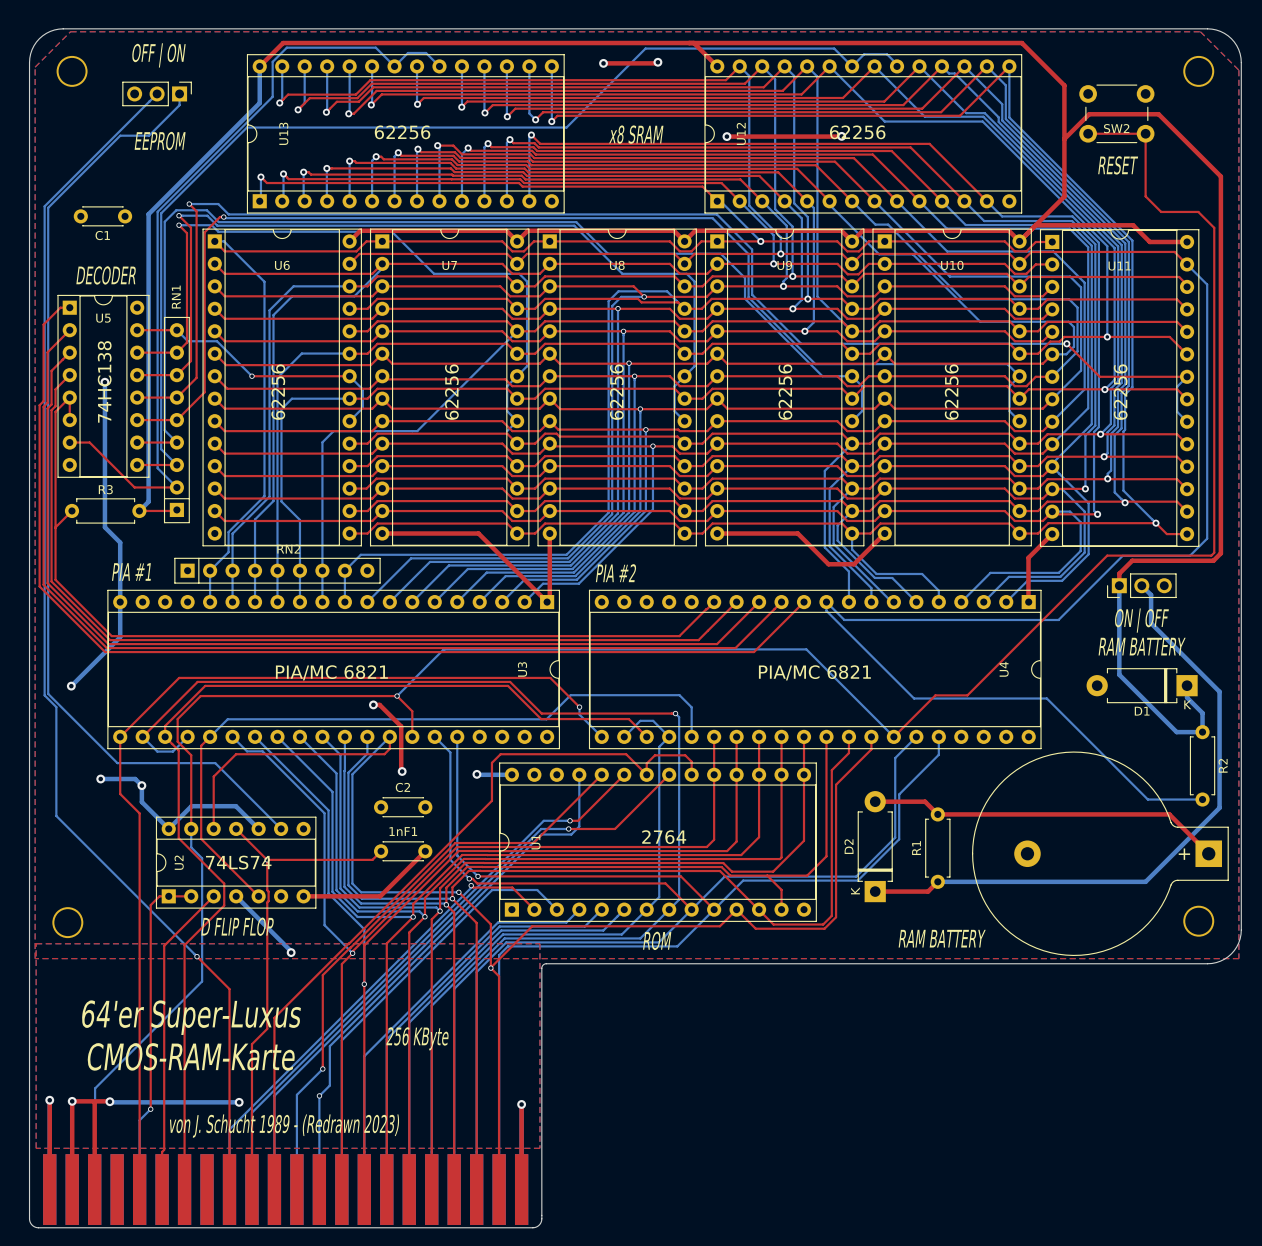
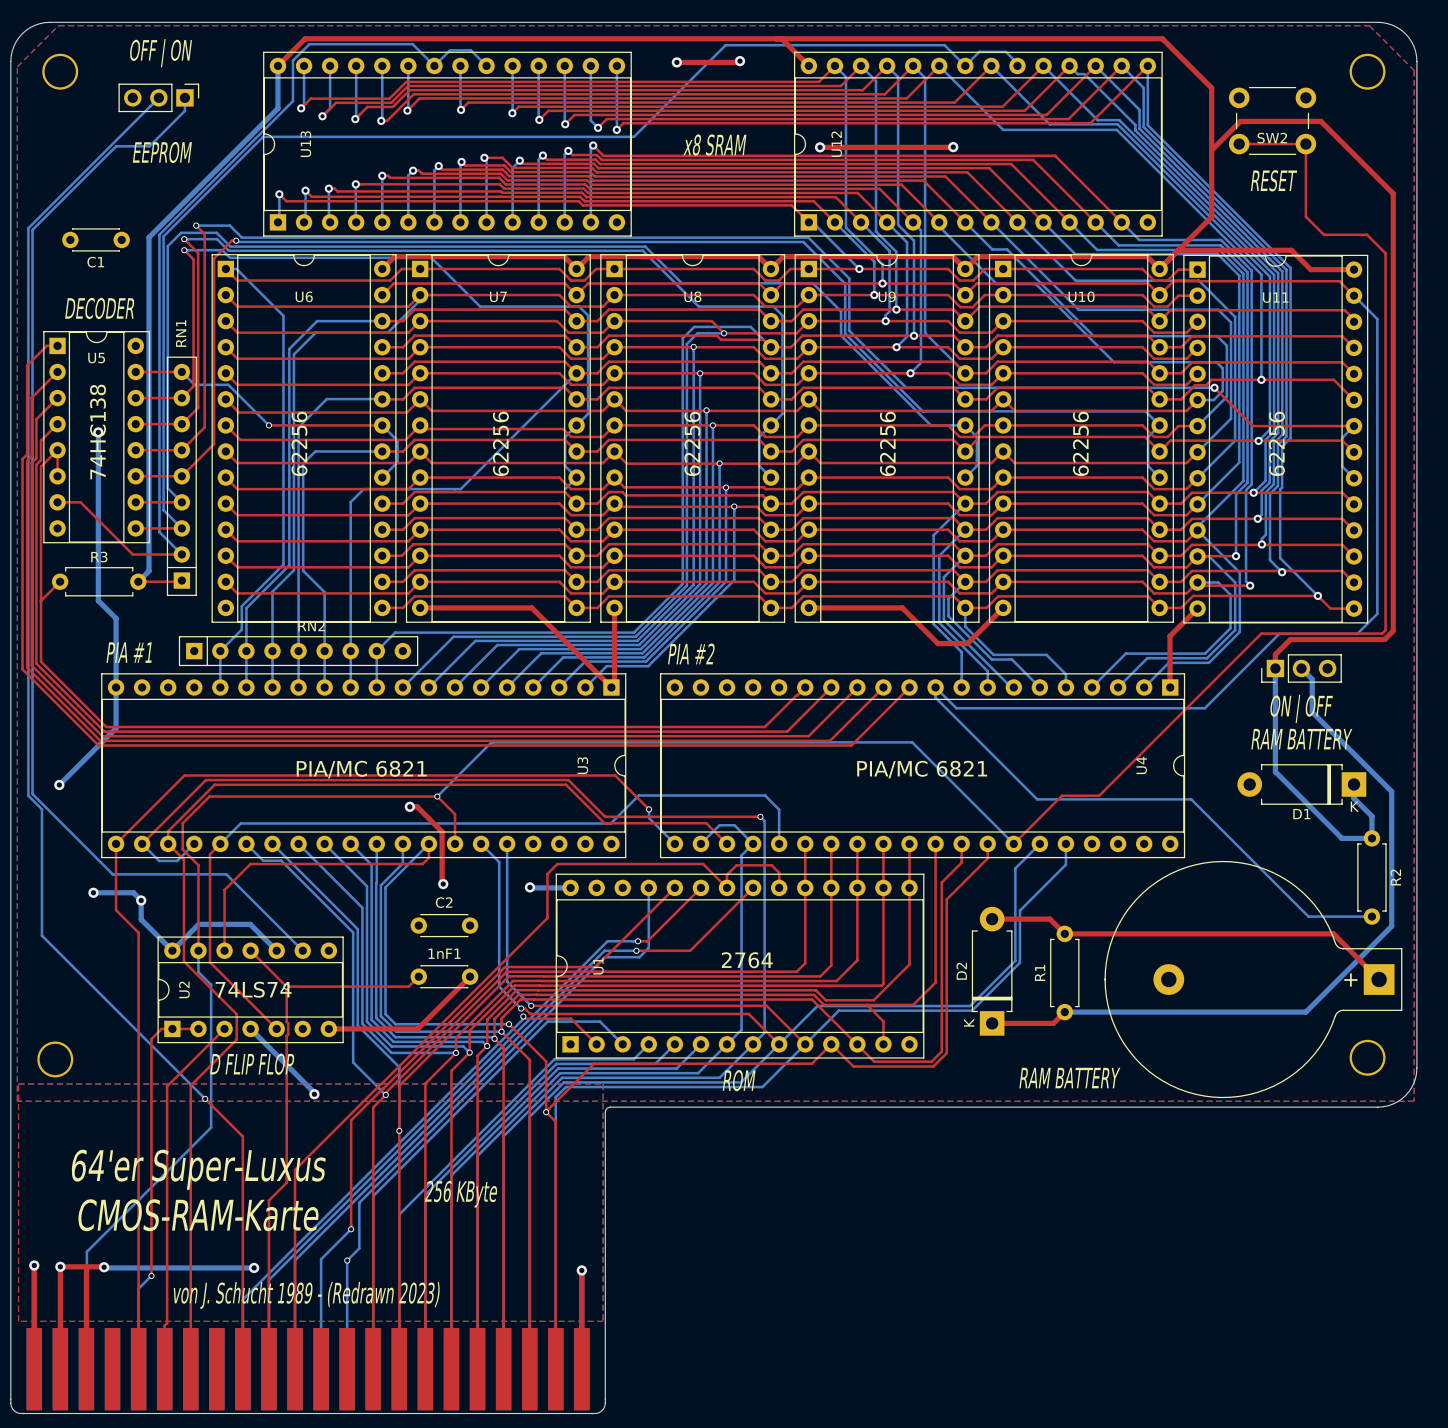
text: 62256 (402, 132) -> none
text: 62256 (857, 132) -> none

